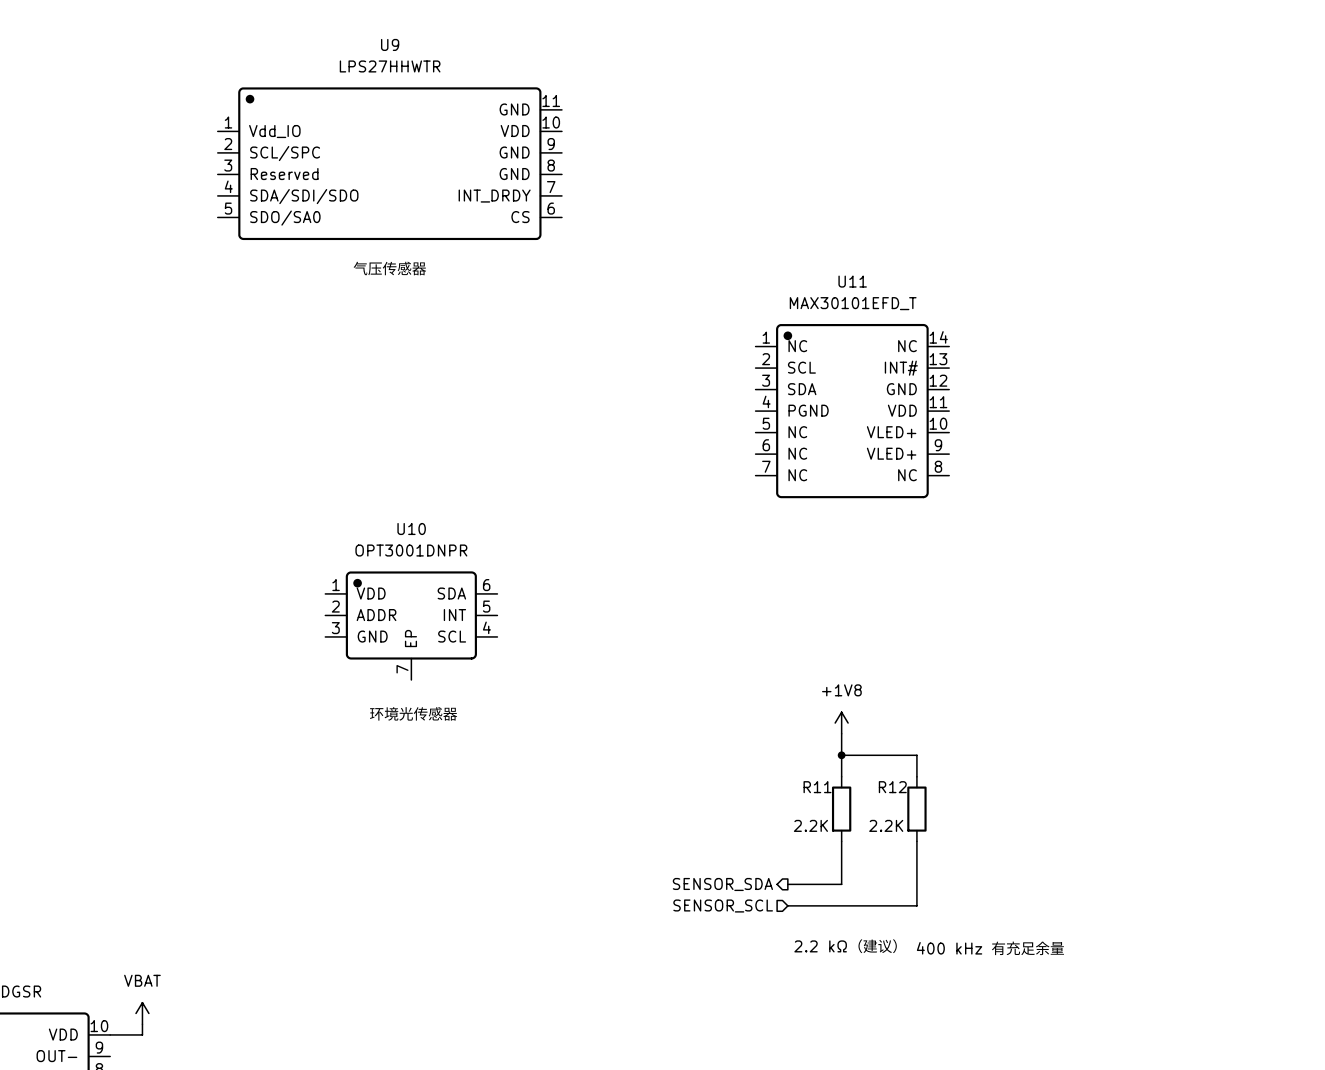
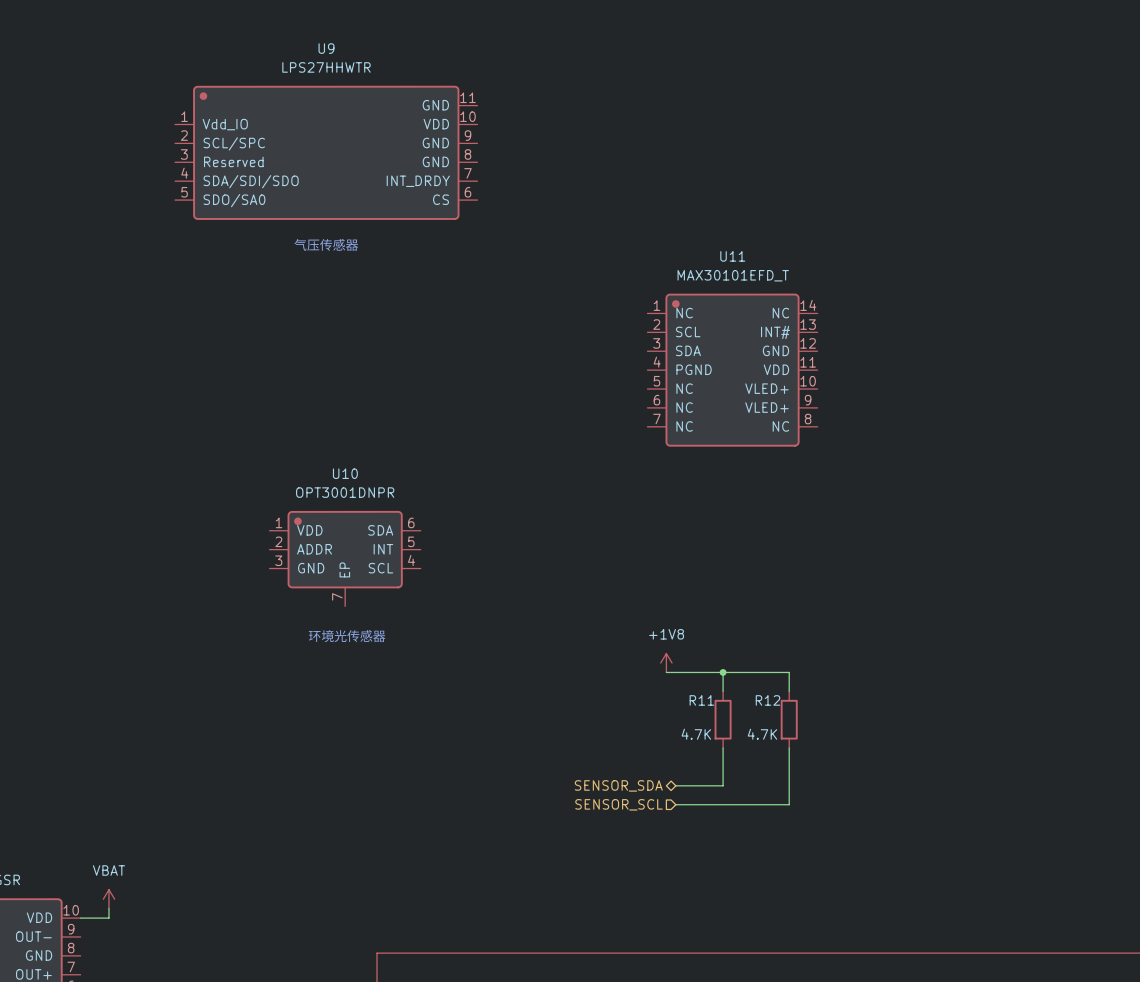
power symbol position: +1V8 (841, 723) -> +1V8 (666, 663)
wire: (841, 733) (841, 755) -> (666, 672) (723, 672)
R11 value: 2.2K (810, 825) -> 4.7K (696, 734)
R12 value: 2.2K (886, 825) -> 4.7K (762, 734)
hierarchical label shape: output (722, 884) -> bidirectional (618, 785)
text: 2.2 kΩ（建议） (845, 946) -> none
text: 400 kHz 有充足余量 (990, 948) -> none

